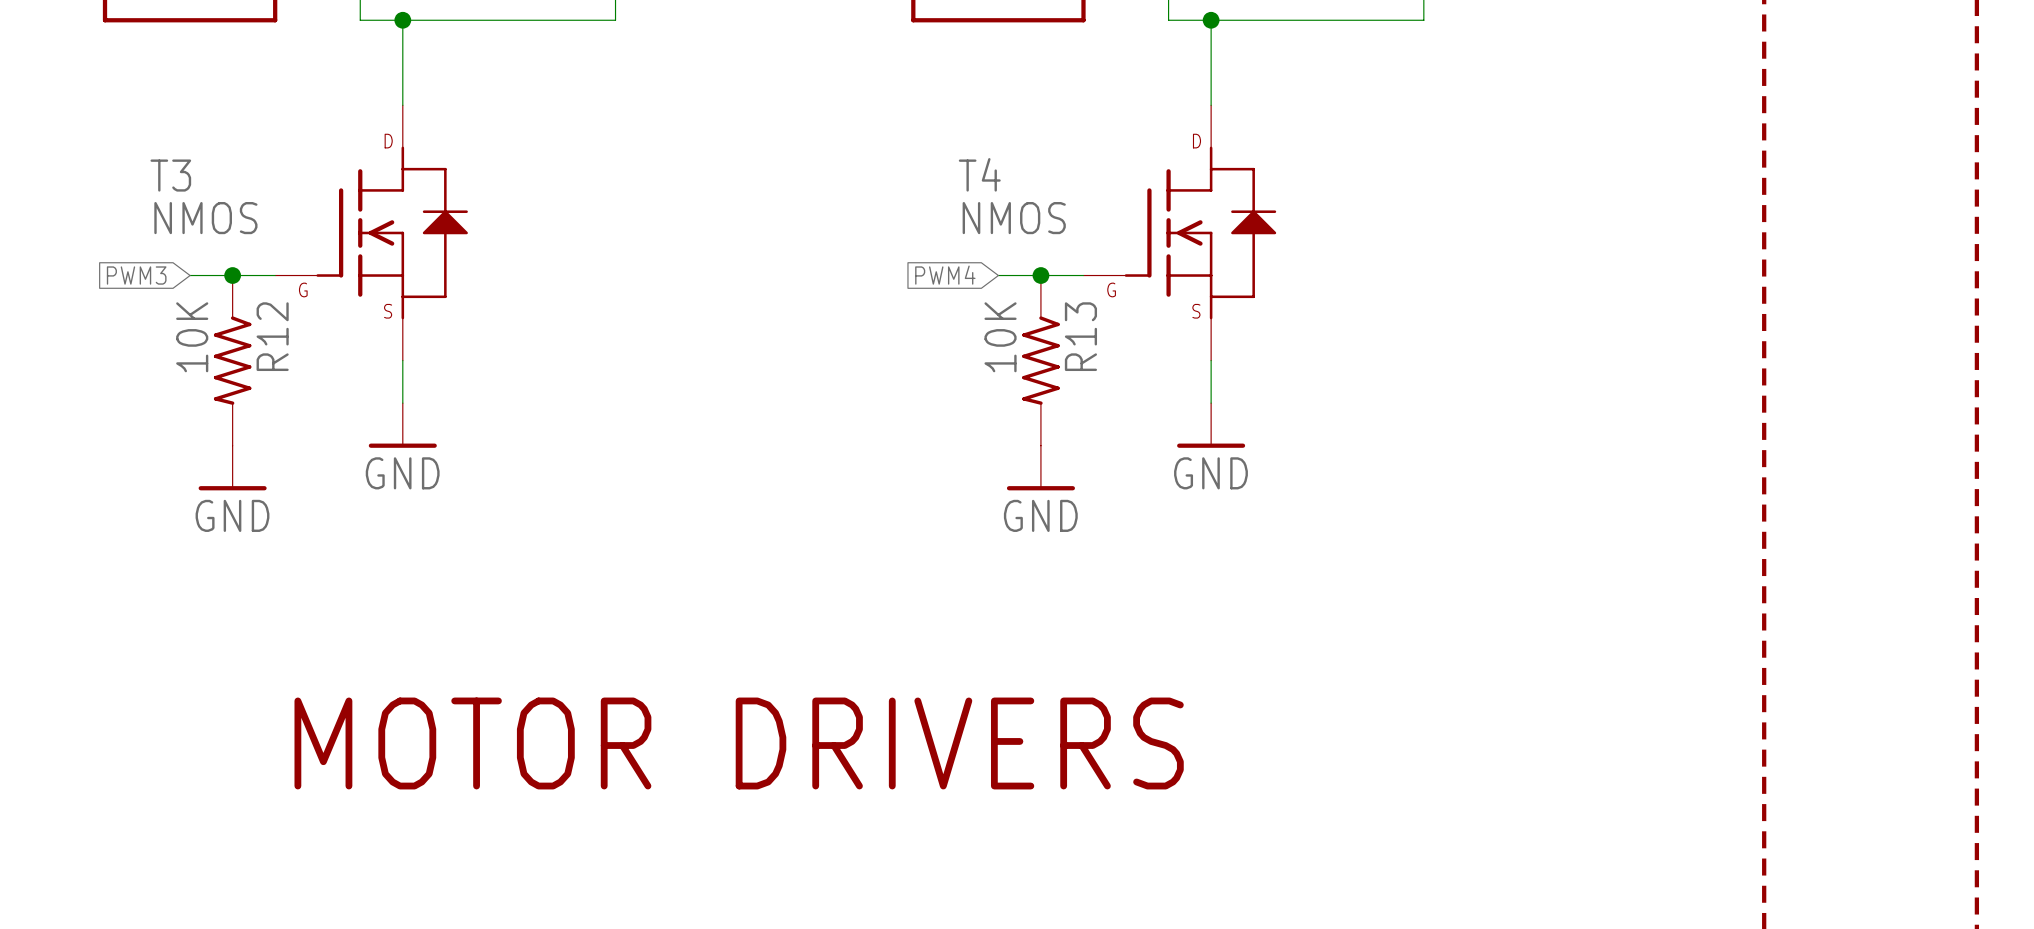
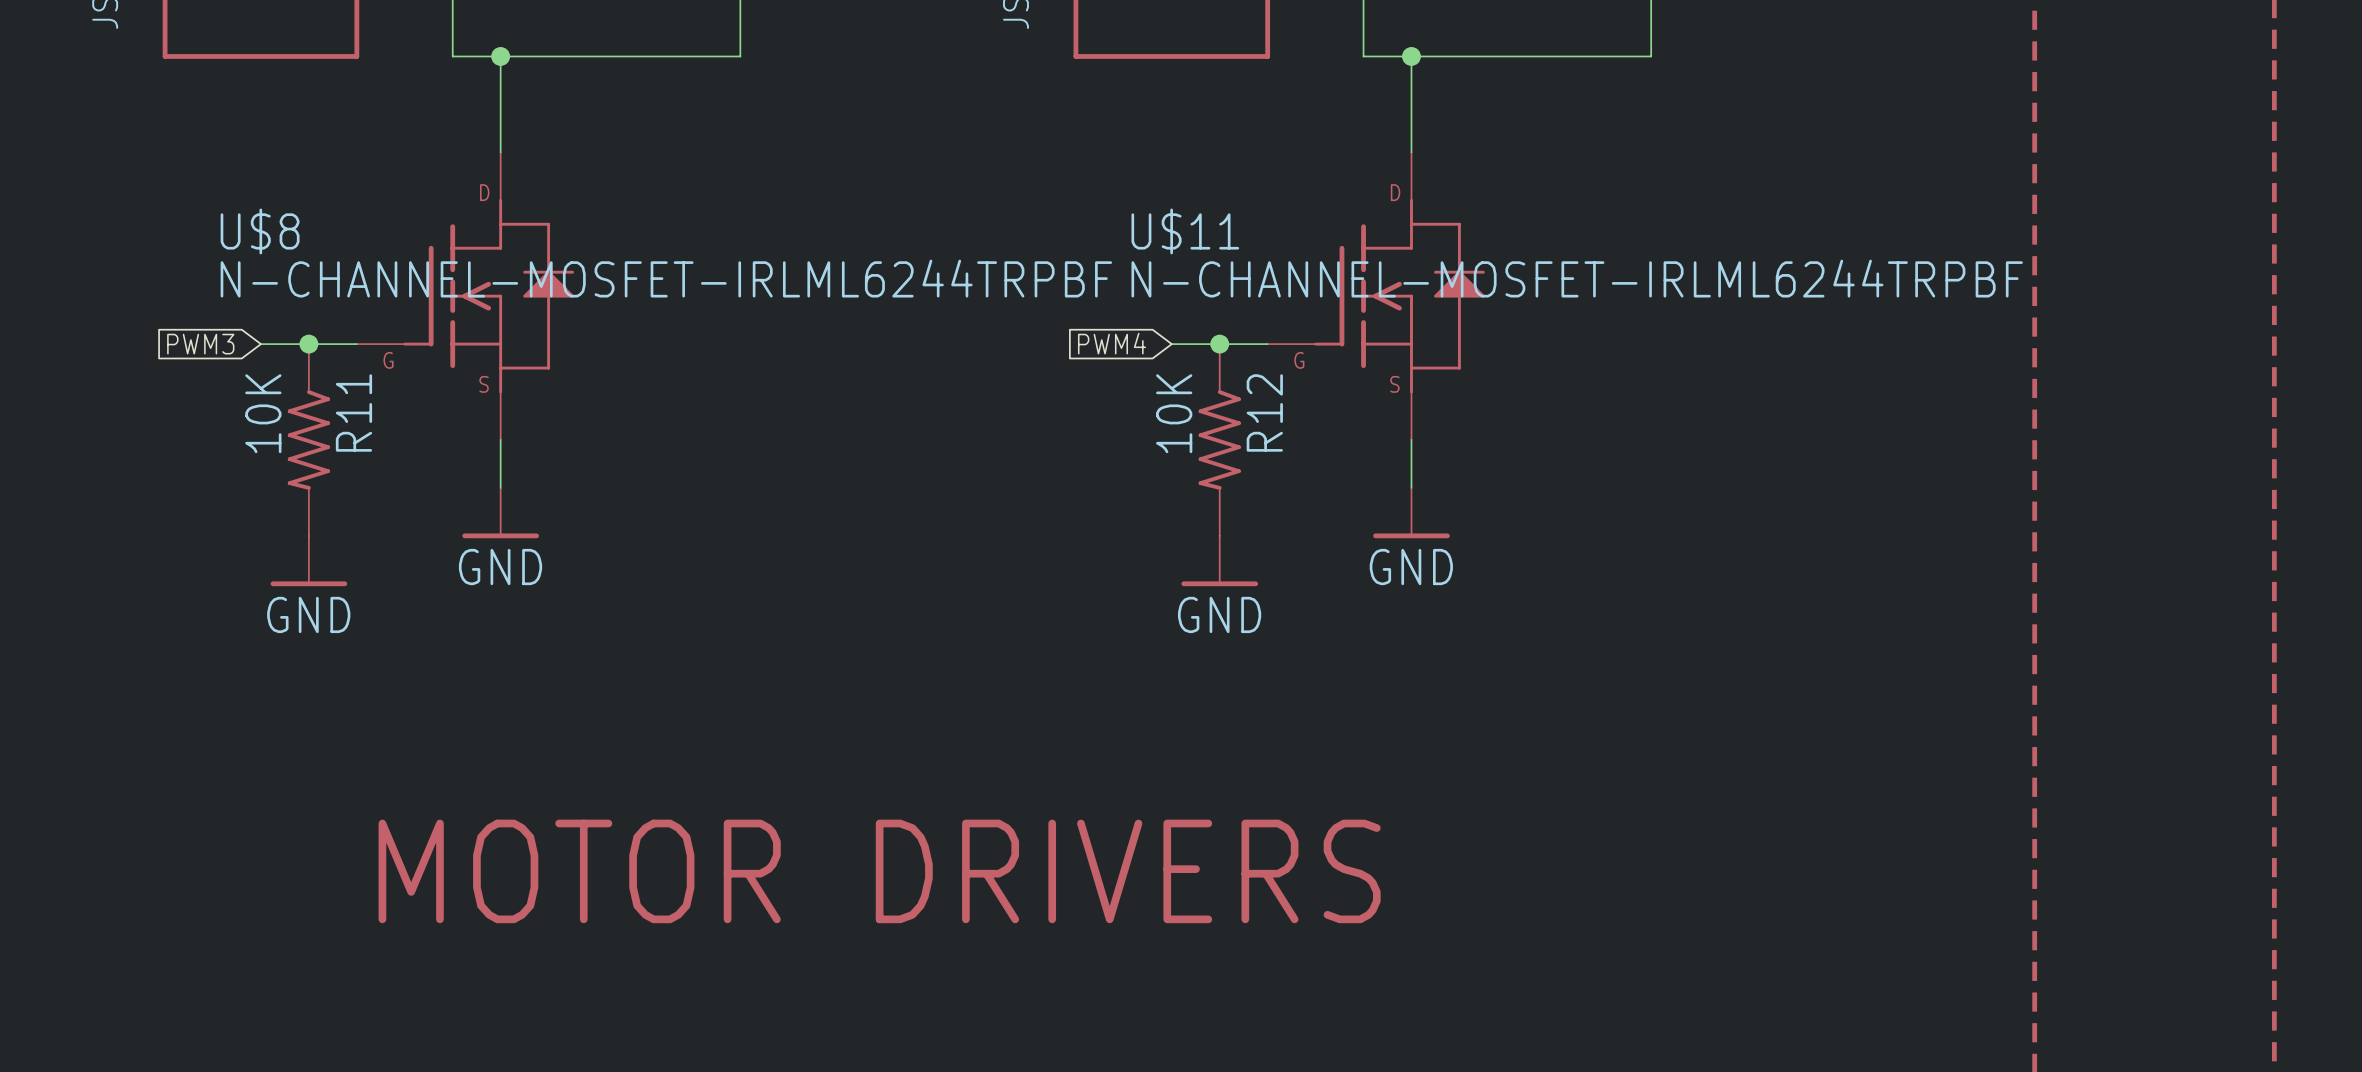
T4 name: T4 (979, 174) -> U$11 (1185, 231)
T3 name: T3 (170, 175) -> U$8 (260, 231)
T3 value: NMOS (205, 218) -> N-CHANNEL-MOSFET-IRLML6244TRPBF (666, 278)
T4 value: NMOS (1014, 218) -> N-CHANNEL-MOSFET-IRLML6244TRPBF (1577, 278)
R12 name: R12 (272, 336) -> R11 (353, 412)
R13 name: R13 (1080, 336) -> R12 (1264, 412)

